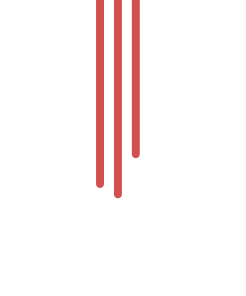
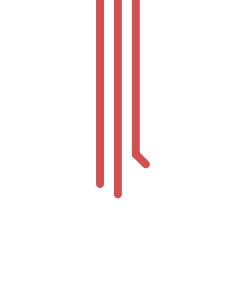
track: none -> (135, 154) (145, 164)

